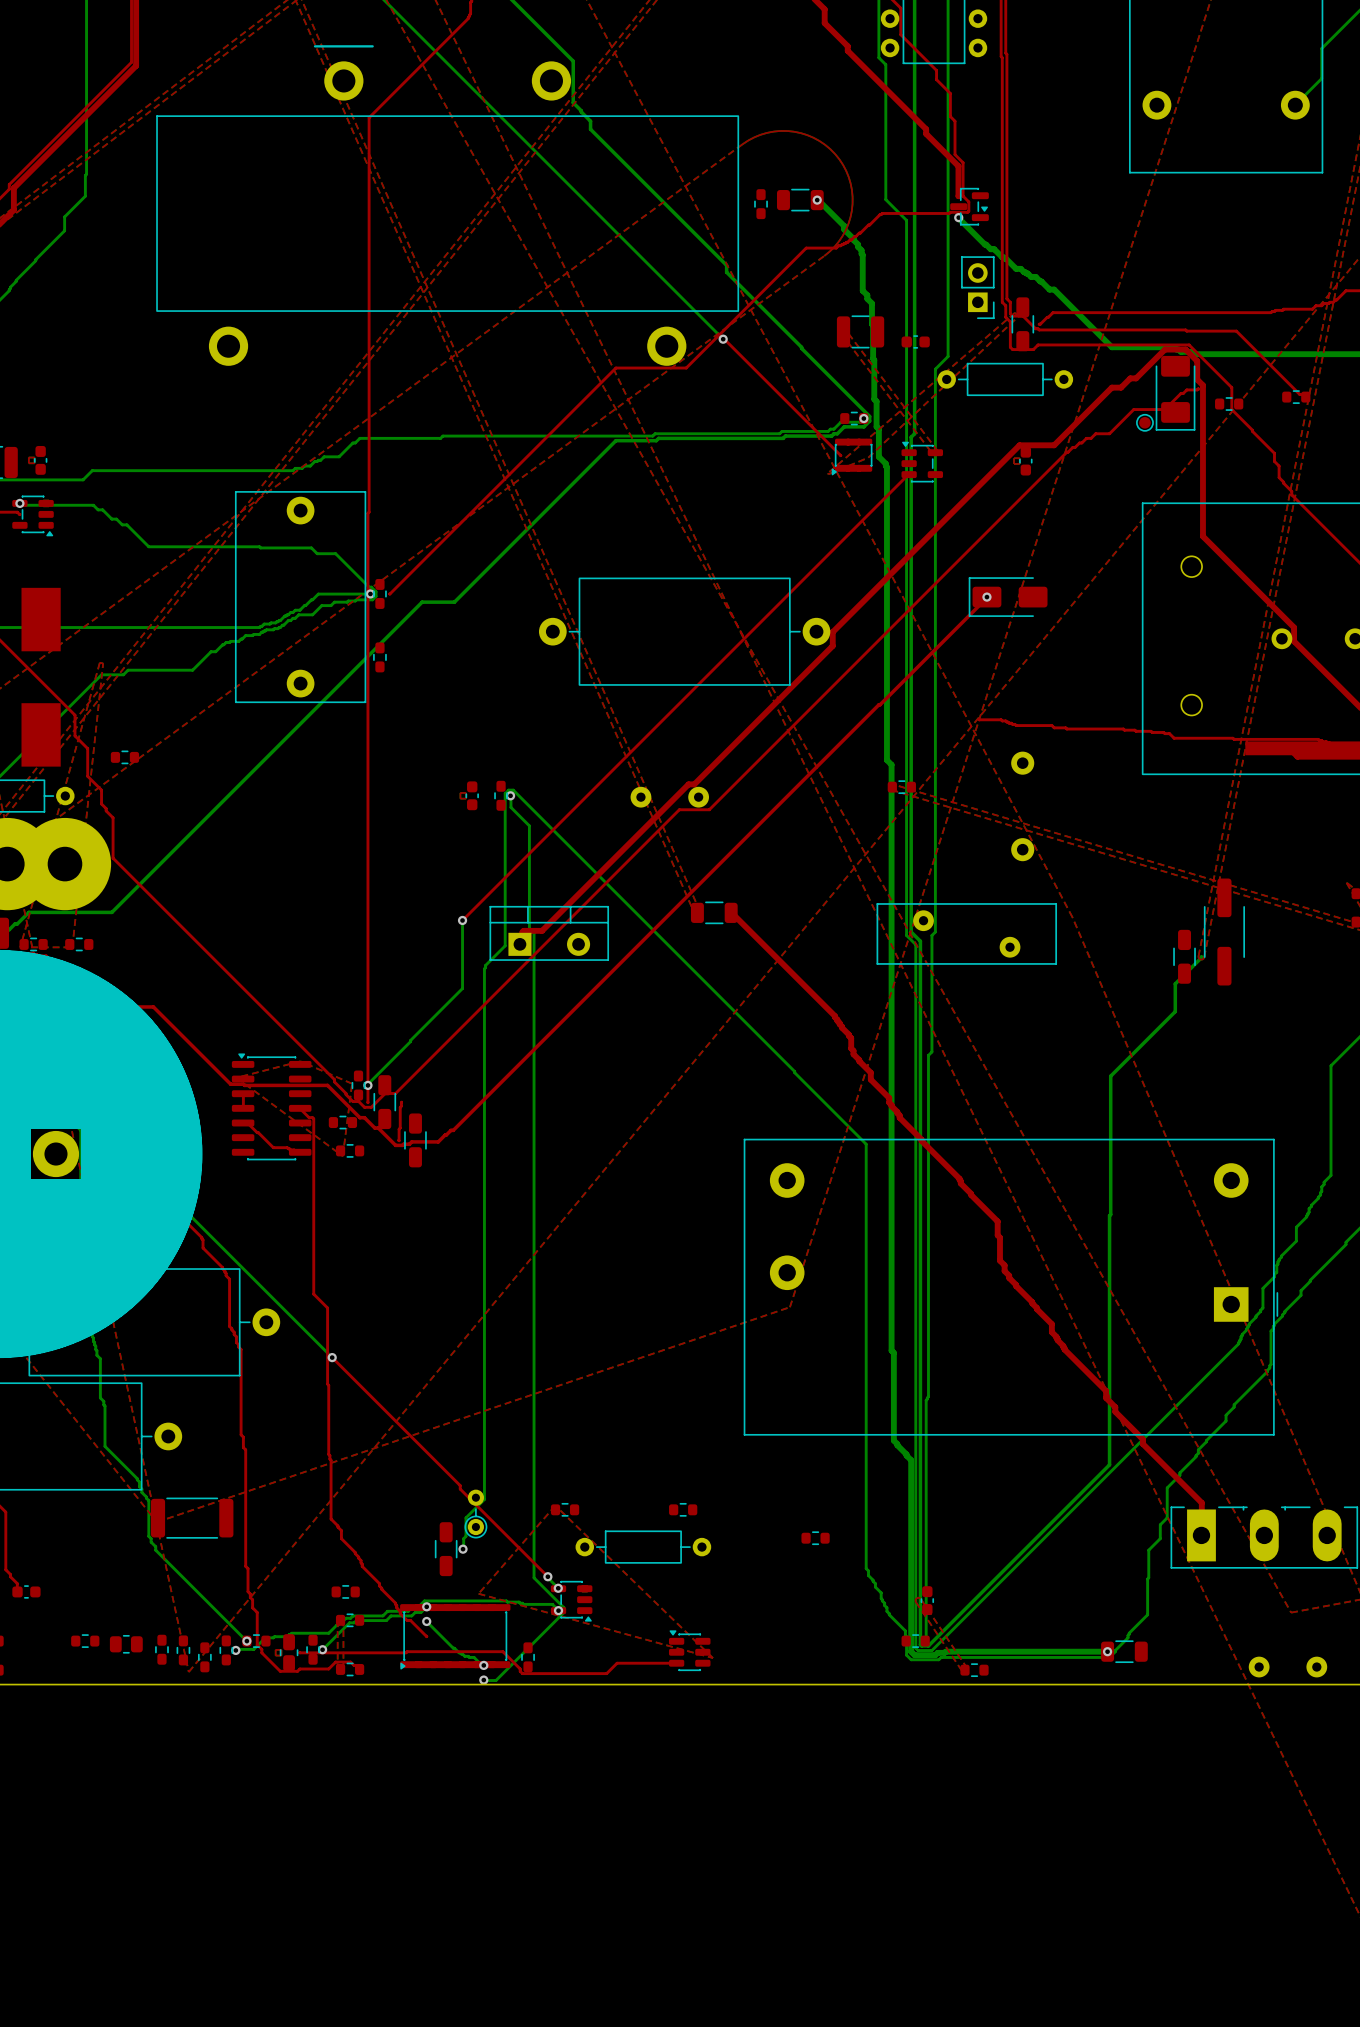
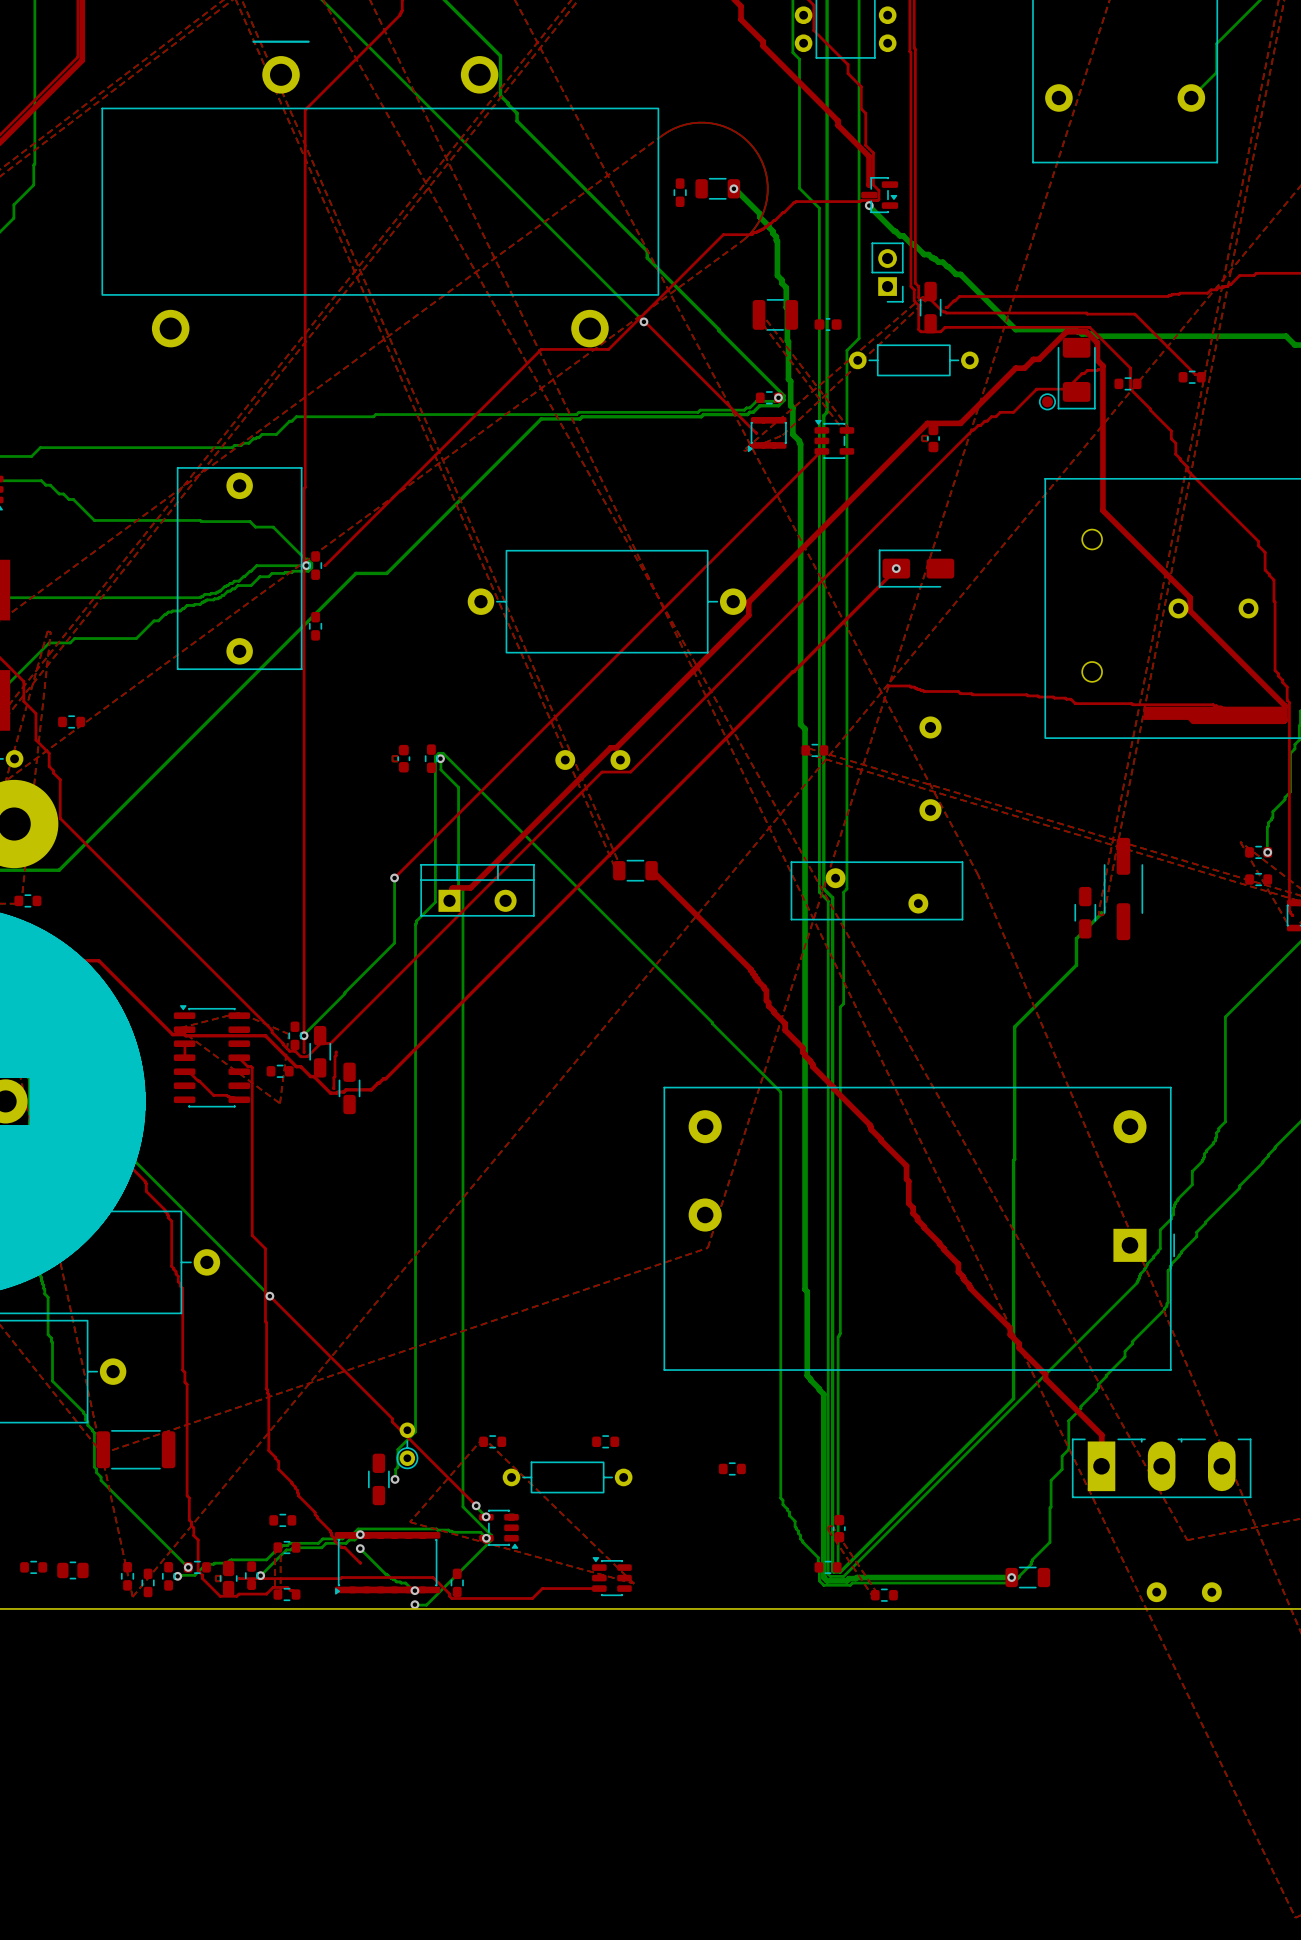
part: (350, 1150) -> none
part: (161, 1649) -> none

